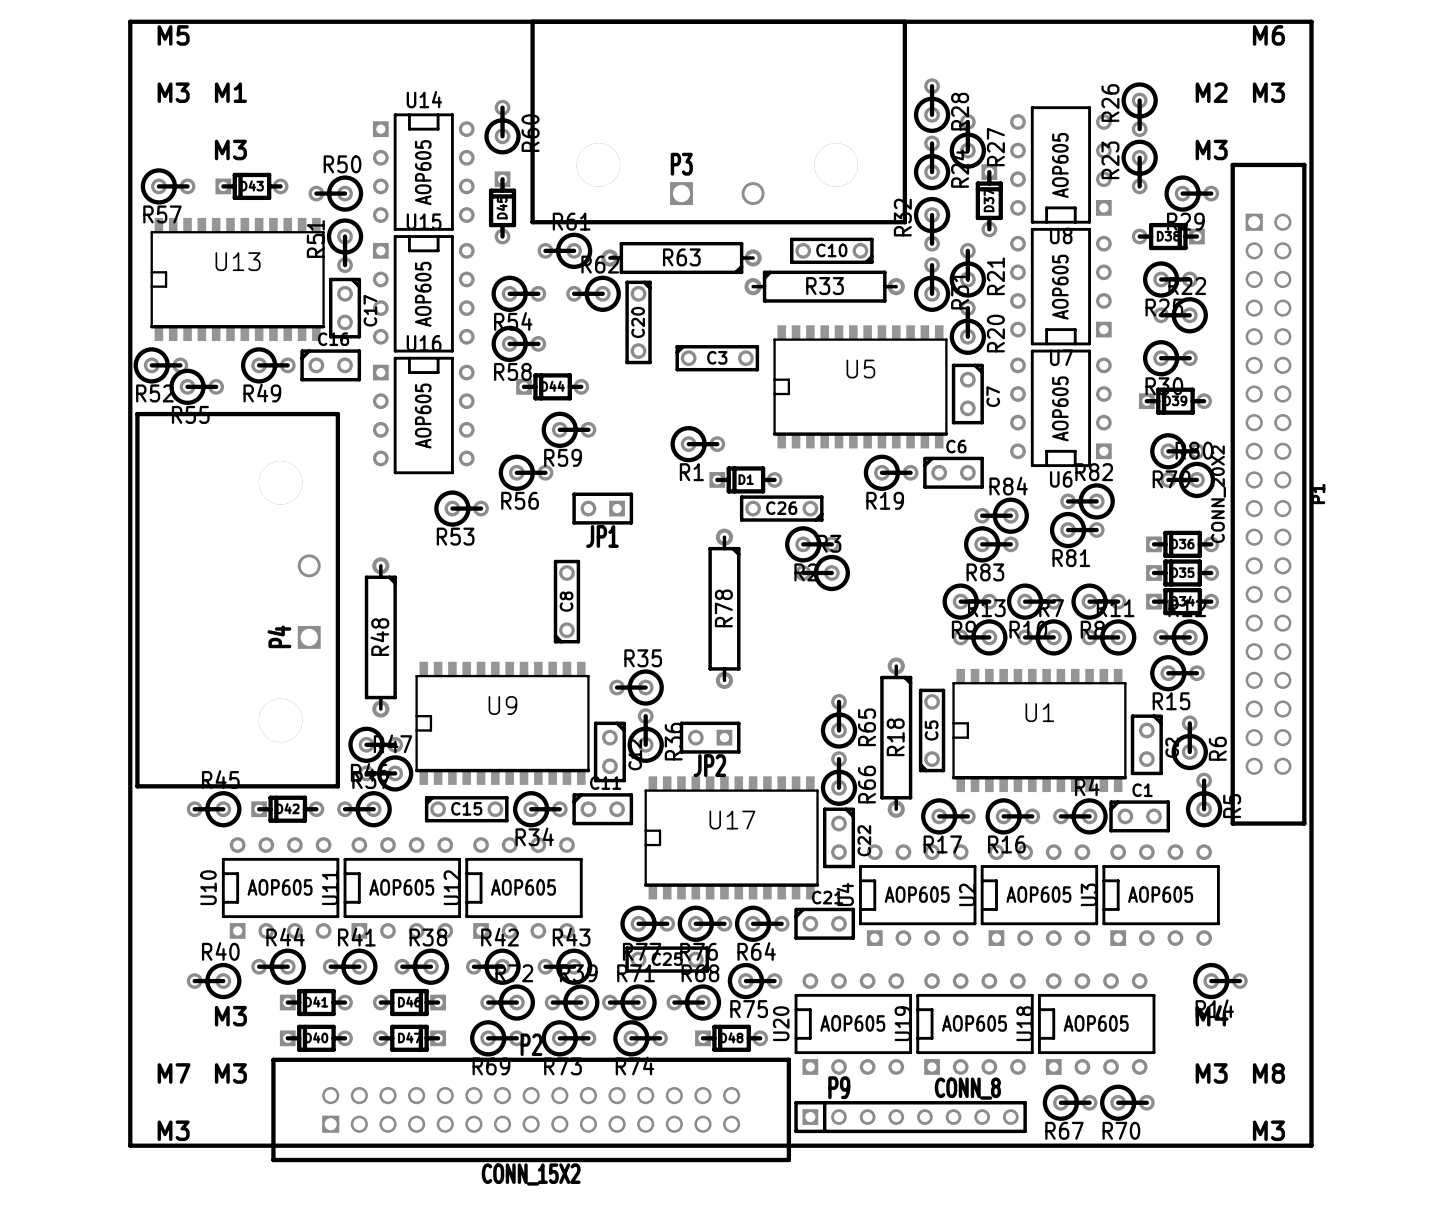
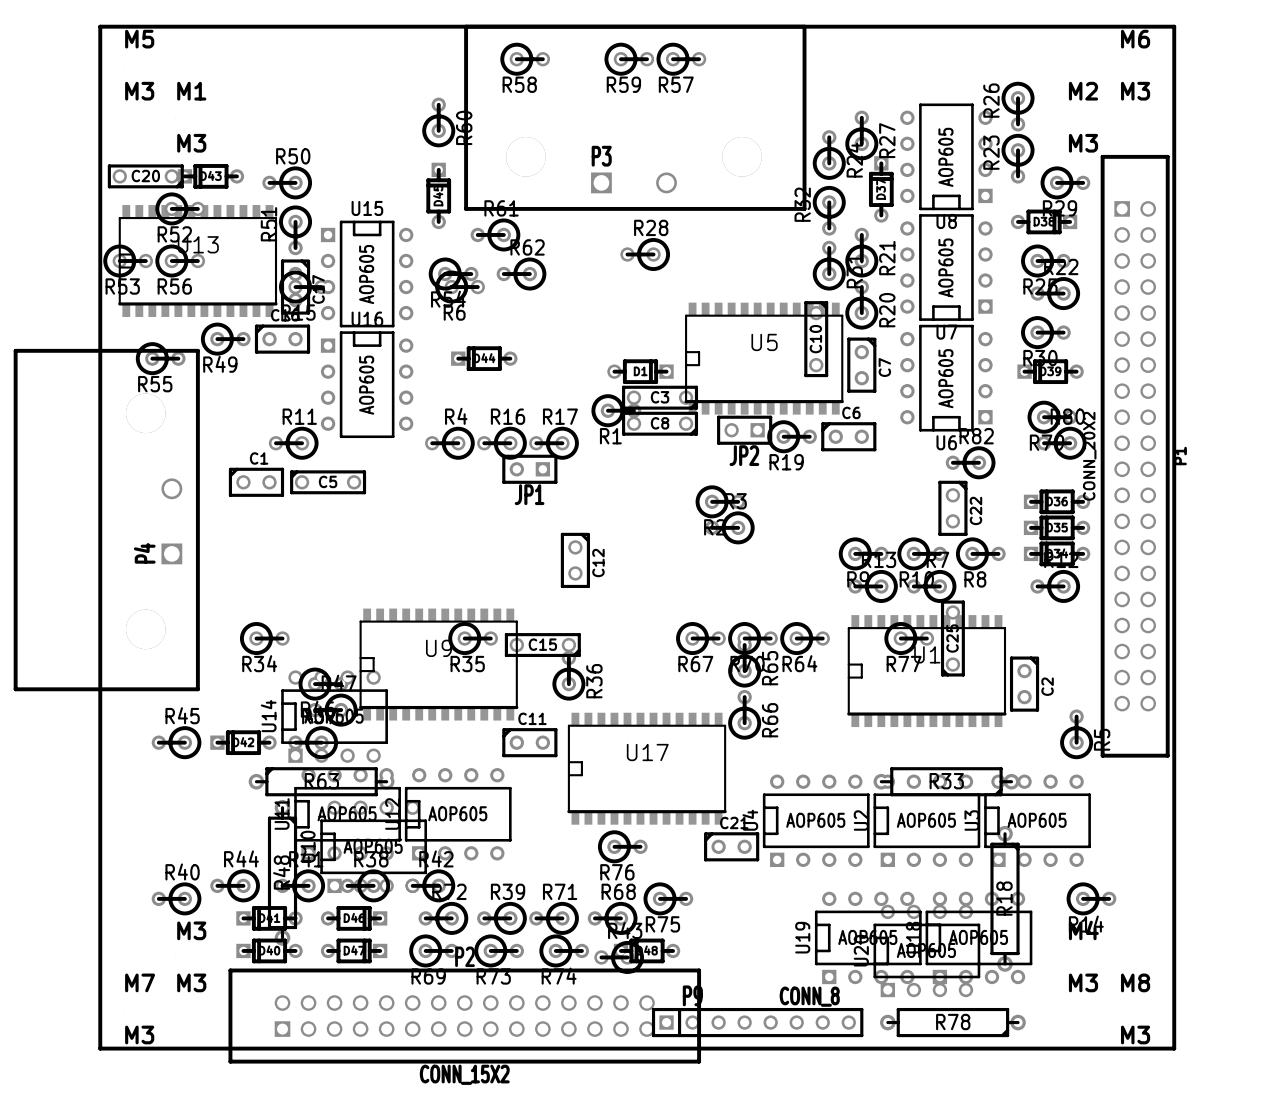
R28 footprint: [913, 78, 951, 133] -> [620, 237, 671, 272]
U14 name position: U14 (424, 99) -> U14 (268, 716)
R28 name position: R28 (960, 111) -> R28 (651, 227)
U14 footprint: [372, 113, 475, 231] -> [281, 670, 388, 763]
R57 footprint: [140, 168, 196, 205] -> [656, 42, 707, 76]
C10 footprint: [790, 237, 874, 265] -> [804, 301, 829, 378]
R63 footprint: [601, 241, 762, 275] -> [248, 767, 395, 797]
R33 footprint: [744, 270, 905, 303] -> [873, 767, 1020, 797]
C20 footprint: [625, 280, 652, 365] -> [107, 164, 184, 189]
R58 footprint: [491, 325, 547, 363] -> [500, 42, 551, 76]
C3 footprint: [675, 345, 760, 372] -> [622, 385, 699, 410]
R52 footprint: [133, 347, 189, 384] -> [155, 192, 206, 226]
R59 footprint: [541, 411, 597, 448] -> [604, 42, 655, 76]
R56 footprint: [498, 454, 554, 491] -> [155, 244, 206, 278]
D1 footprint: [709, 466, 783, 494] -> [607, 359, 674, 385]
R53 footprint: [434, 490, 489, 527] -> [103, 244, 153, 278]
C26: (781, 508) -> none
R84: (1001, 515) -> none
R78 footprint: [708, 528, 741, 689] -> [880, 1007, 1026, 1038]
R81: (1077, 530) -> none
R83: (991, 544) -> none
R48 footprint: [364, 557, 397, 718] -> [267, 799, 298, 946]
C8 footprint: [553, 559, 581, 644] -> [622, 411, 699, 436]
P4 position: (237, 600) -> (106, 520)
R11 footprint: [1081, 619, 1137, 656] -> [268, 426, 319, 460]
R15 footprint: [1150, 655, 1205, 692] -> [279, 270, 329, 304]
R18 footprint: [880, 657, 913, 818] -> [990, 825, 1020, 972]
R35 name position: R35 (643, 658) -> R35 (467, 664)
R35 footprint: [609, 669, 664, 706] -> [448, 622, 498, 656]
C5 footprint: [918, 688, 946, 773] -> [290, 470, 367, 495]
R6 footprint: [1171, 715, 1208, 771] -> [435, 270, 485, 304]
C12 footprint: [593, 721, 626, 783] -> [560, 532, 590, 589]
JP2 footprint: [679, 721, 741, 754] -> [717, 415, 773, 445]
R6 name position: R6 (1217, 748) -> R6 (454, 312)
R34 footprint: [513, 791, 568, 828] -> [239, 622, 290, 656]
C15 footprint: [424, 796, 509, 823] -> [504, 633, 581, 658]
R17 footprint: [921, 798, 976, 835] -> [529, 426, 579, 460]
R16 footprint: [985, 798, 1041, 835] -> [477, 426, 527, 460]
R4 footprint: [1053, 798, 1108, 835] -> [425, 426, 475, 460]
C1 footprint: [1109, 800, 1171, 833] -> [228, 467, 285, 497]
C22 footprint: [822, 807, 856, 869] -> [938, 480, 968, 536]
U10 footprint: [221, 837, 340, 939] -> [320, 800, 428, 894]
R17 name position: R17 (942, 844) -> R17 (560, 416)
R16 name position: R16 (1006, 844) -> R16 (508, 416)
R77 footprint: [620, 905, 676, 942] -> [884, 622, 935, 656]
R64 footprint: [734, 905, 790, 942] -> [780, 622, 830, 656]
C25 footprint: [625, 946, 709, 973] -> [940, 600, 965, 677]
R43 footprint: [537, 948, 593, 985] -> [594, 940, 644, 974]
U20 footprint: [794, 973, 913, 1075] -> [873, 904, 981, 998]
R67 footprint: [1042, 1084, 1098, 1121] -> [676, 622, 726, 656]
R70 footprint: [1100, 1084, 1155, 1121] -> [728, 622, 778, 656]
P9 position: (910, 1117) -> (757, 1022)

